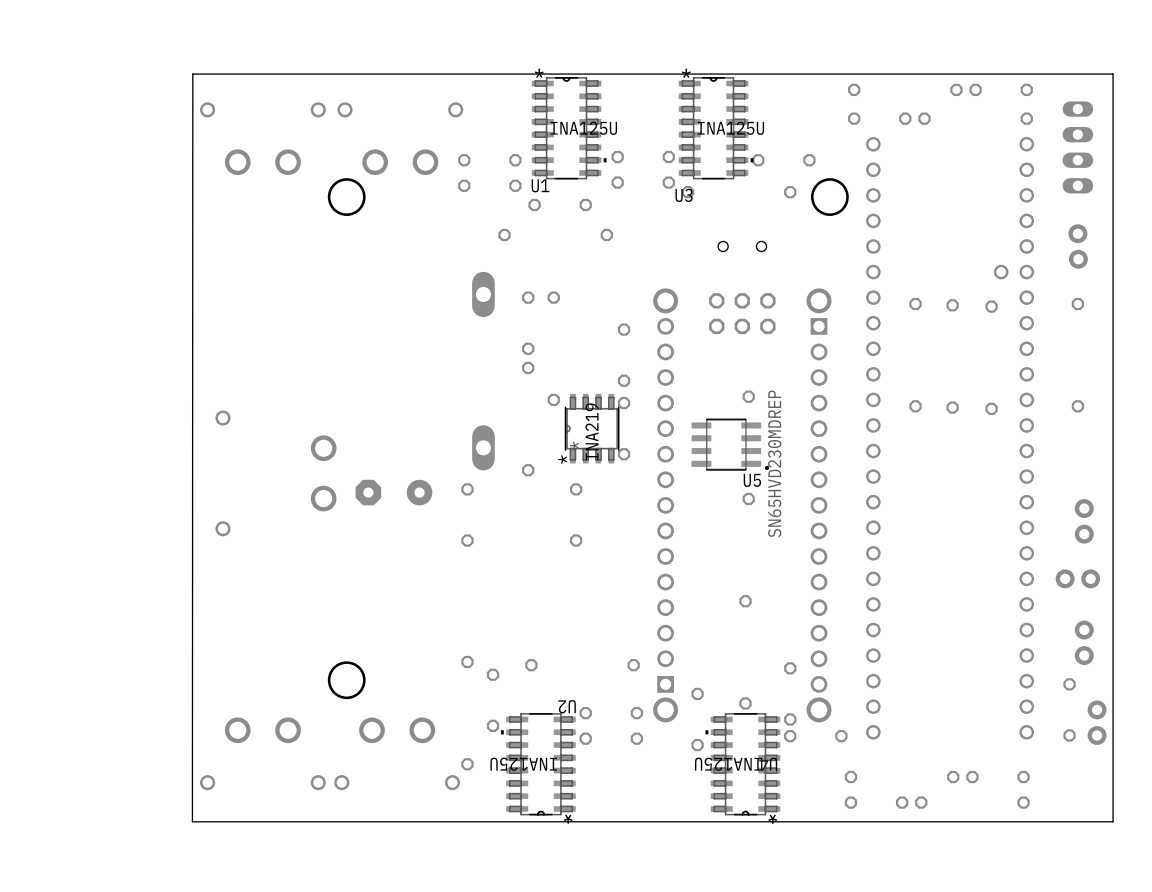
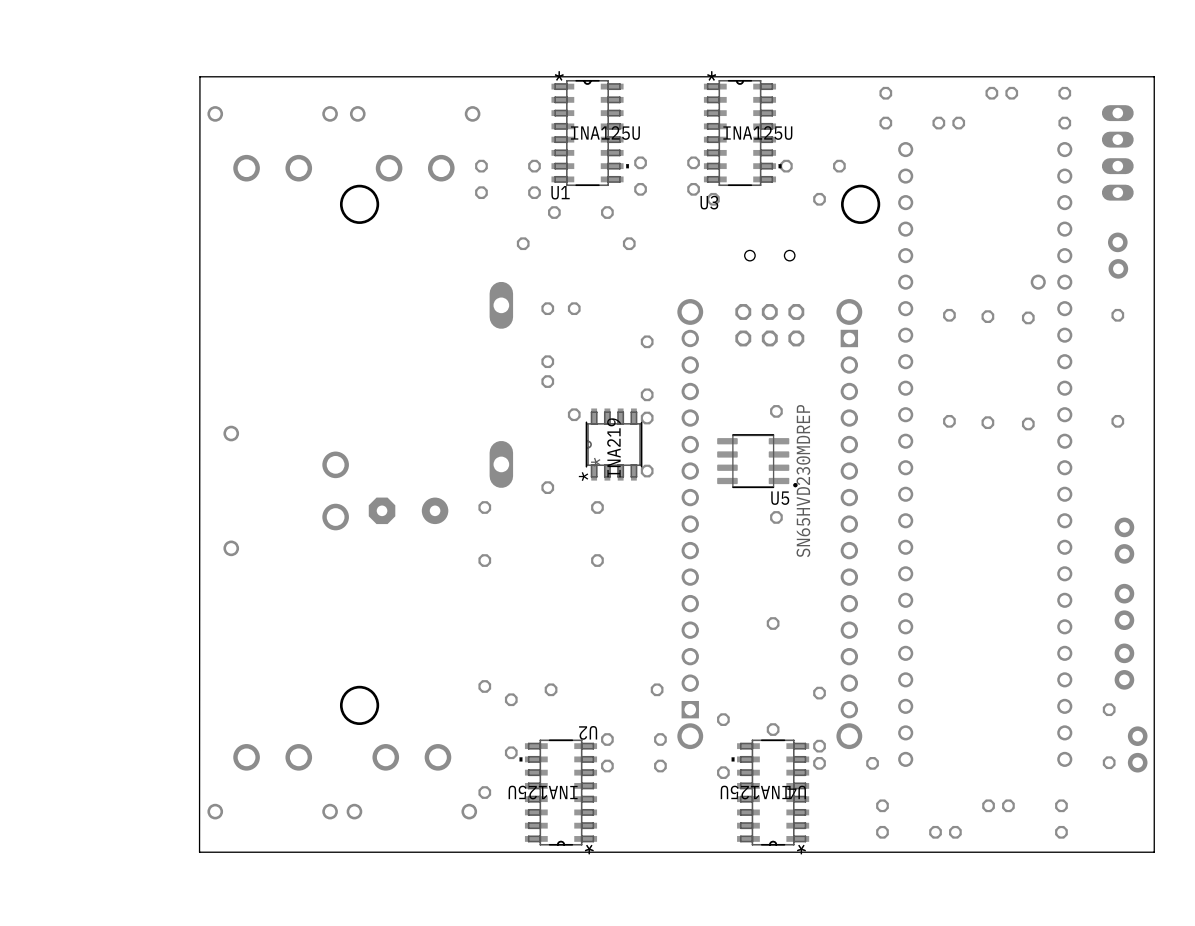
part rotation: 0° (1077, 578) -> 90° clockwise (1124, 606)

